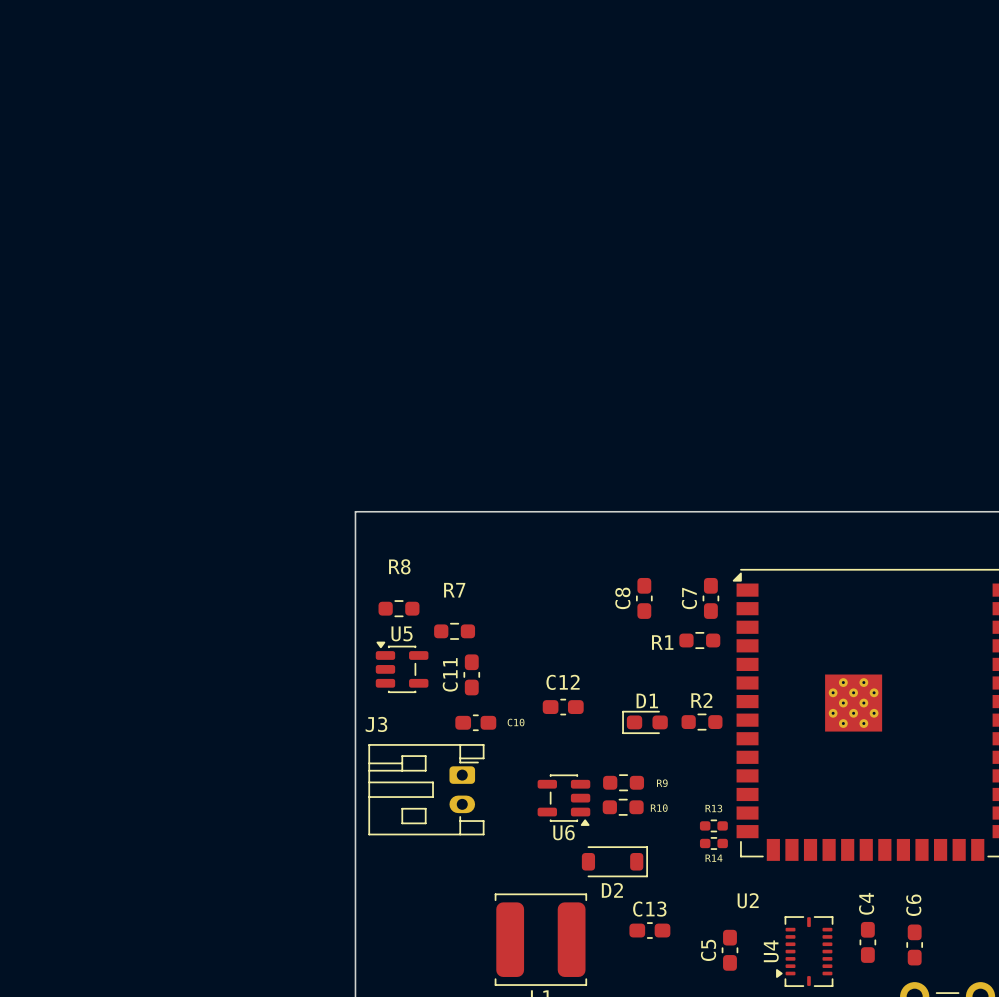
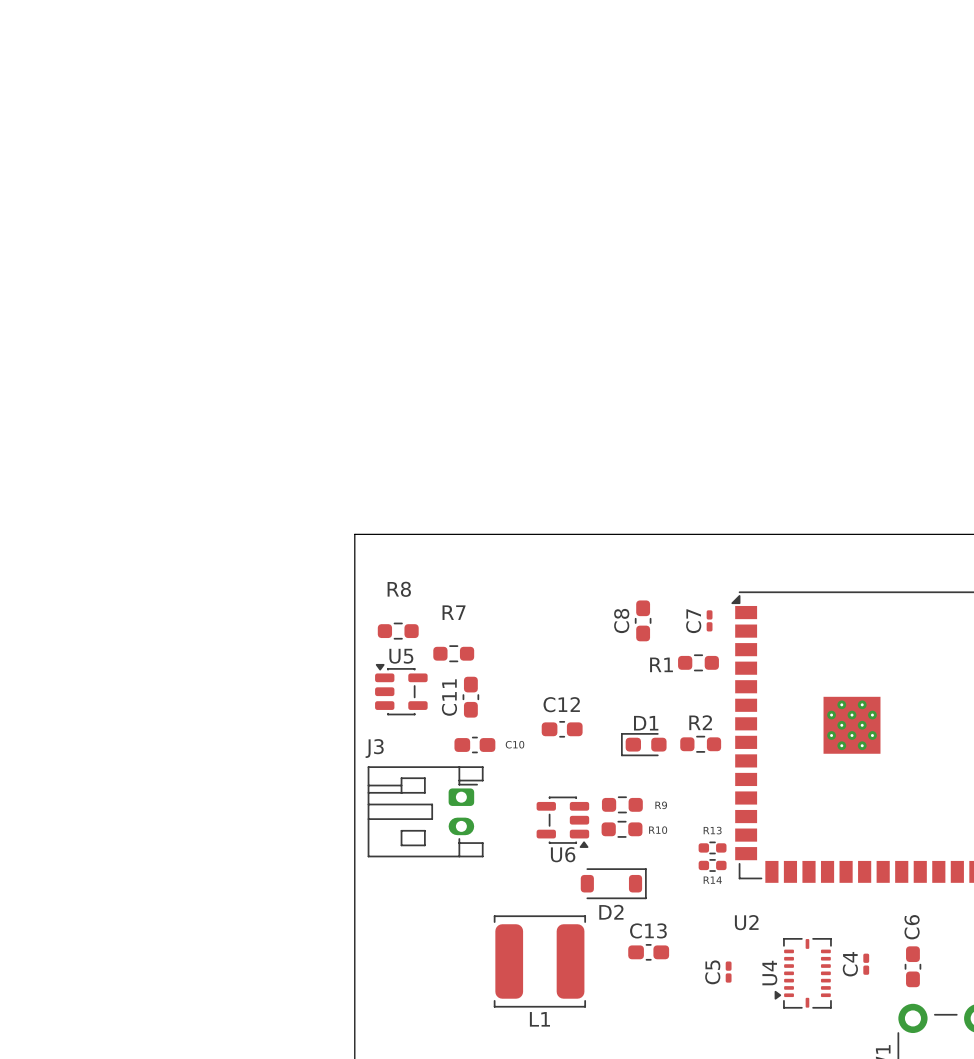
C7 footprint: [702, 577, 720, 619] -> [706, 610, 713, 632]
C4 name position: C4 (866, 903) -> C4 (850, 964)
C4 footprint: [859, 921, 877, 963] -> [863, 953, 870, 975]
C5 footprint: [721, 929, 739, 971] -> [725, 961, 732, 983]

